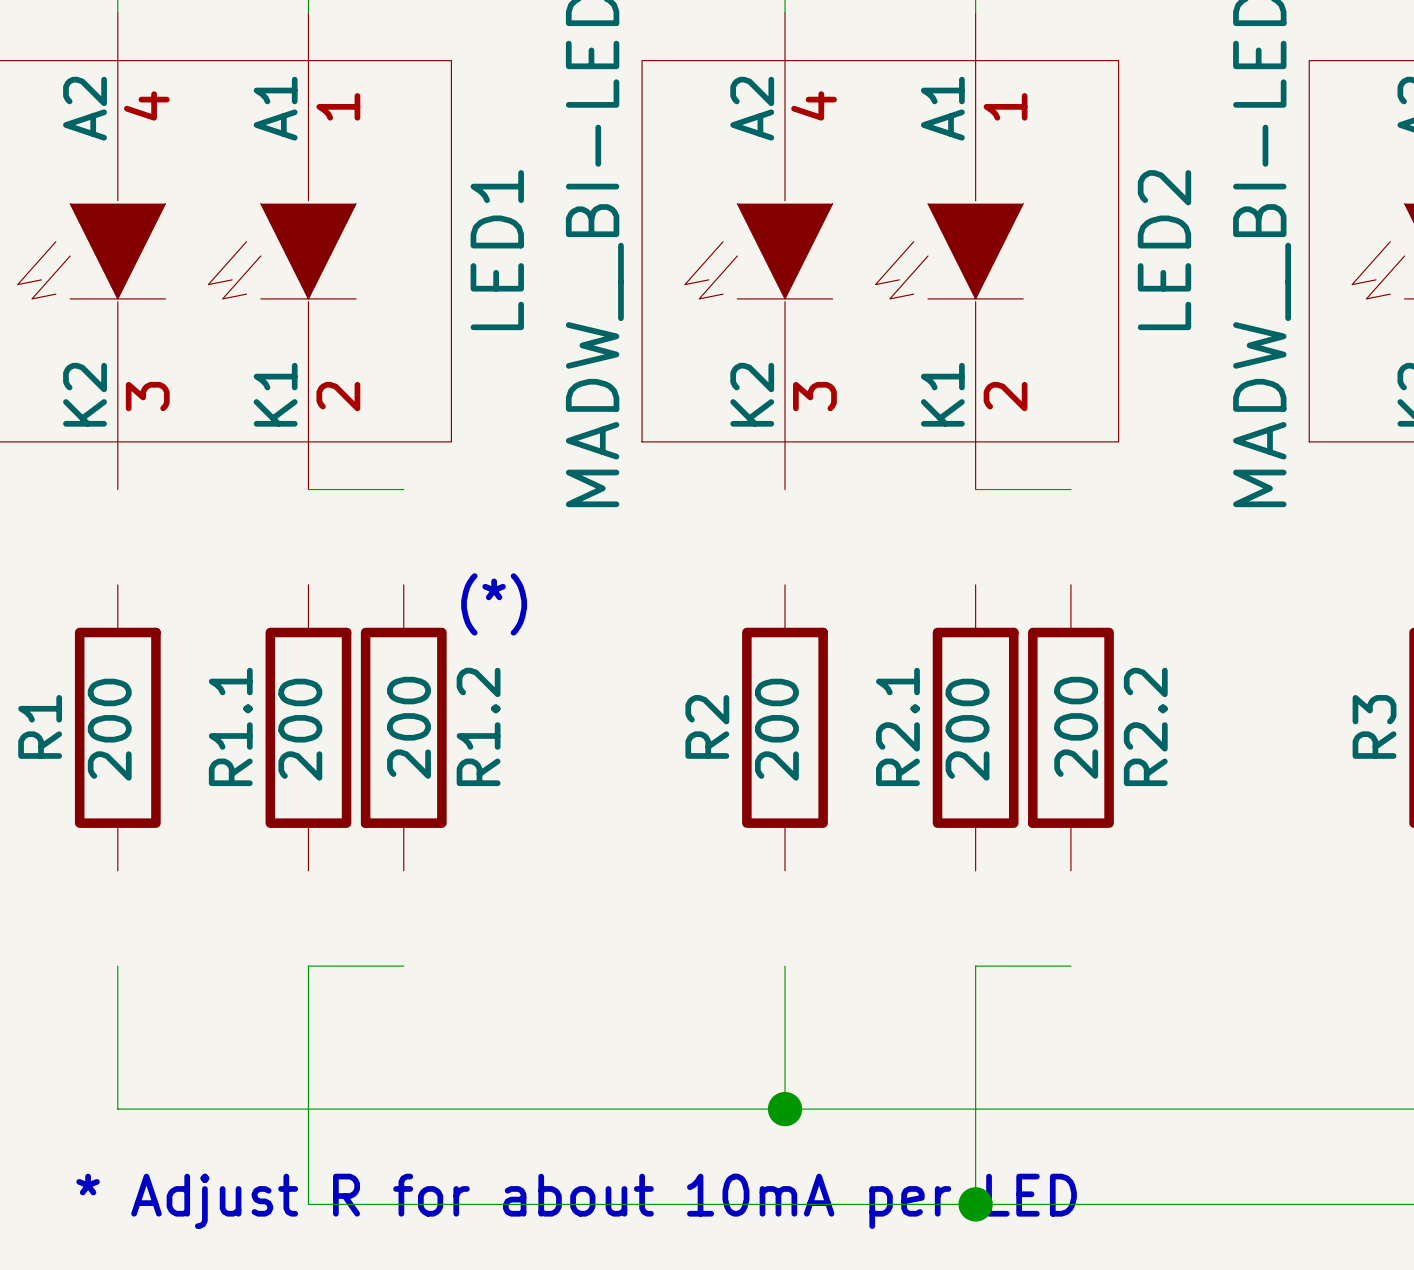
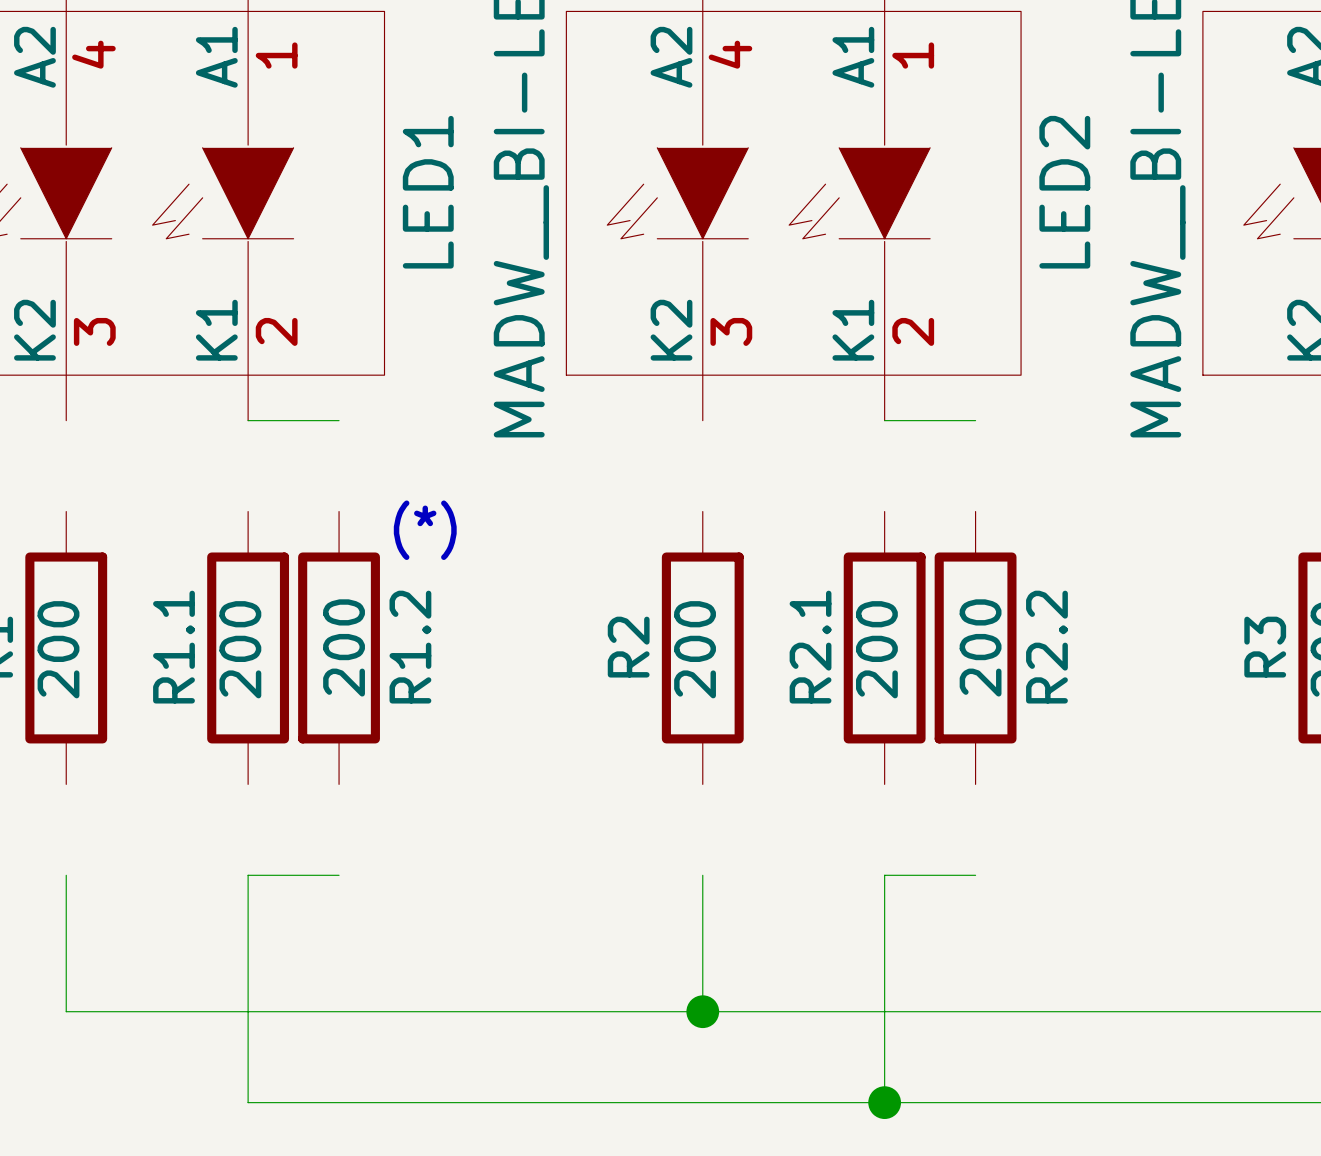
text: * Adjust R for about 10mA per LED (576, 1201) -> none

